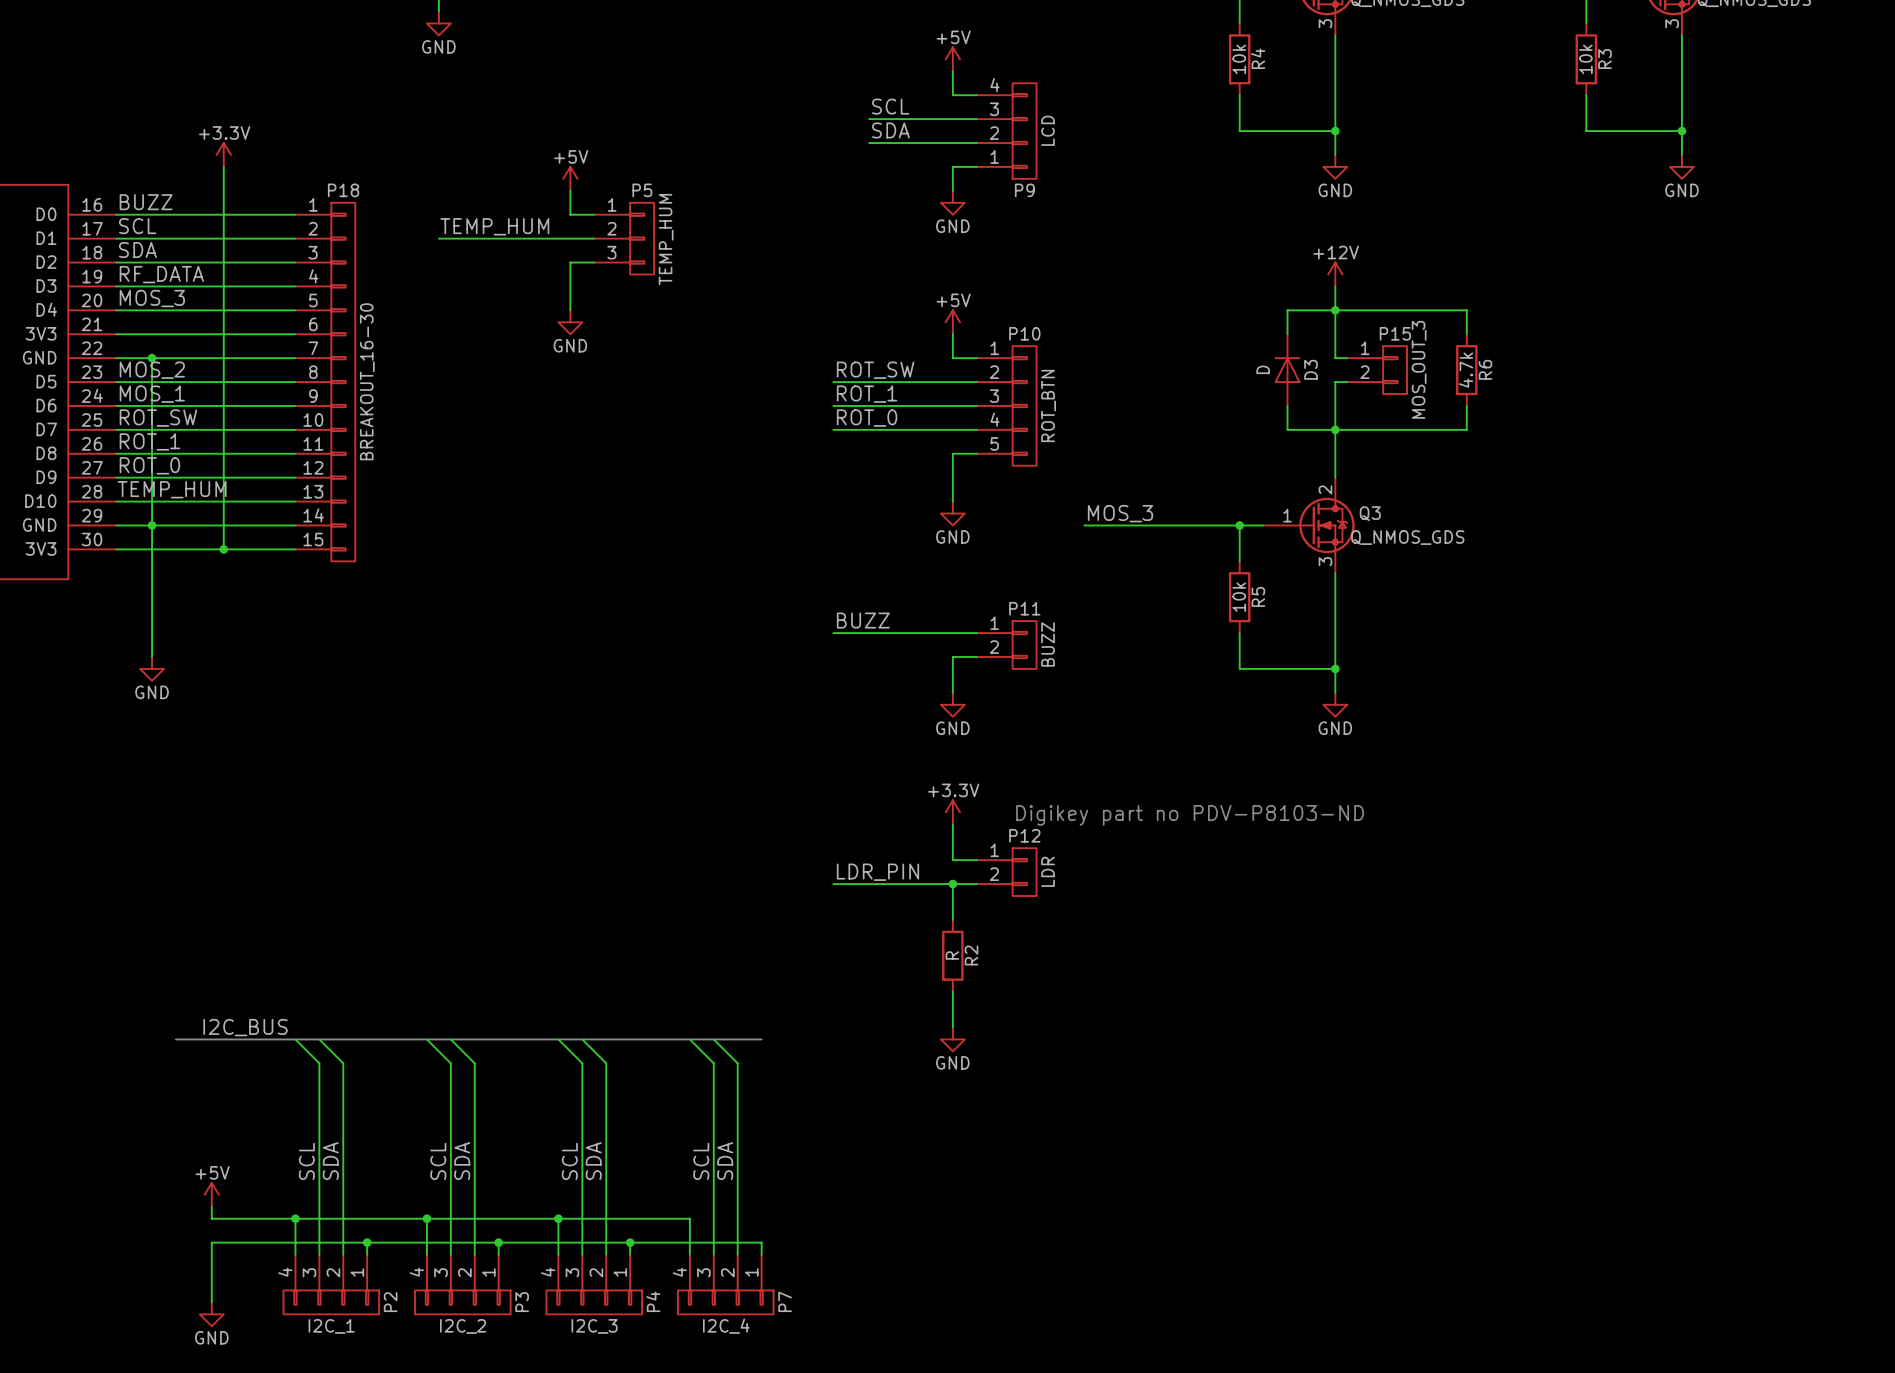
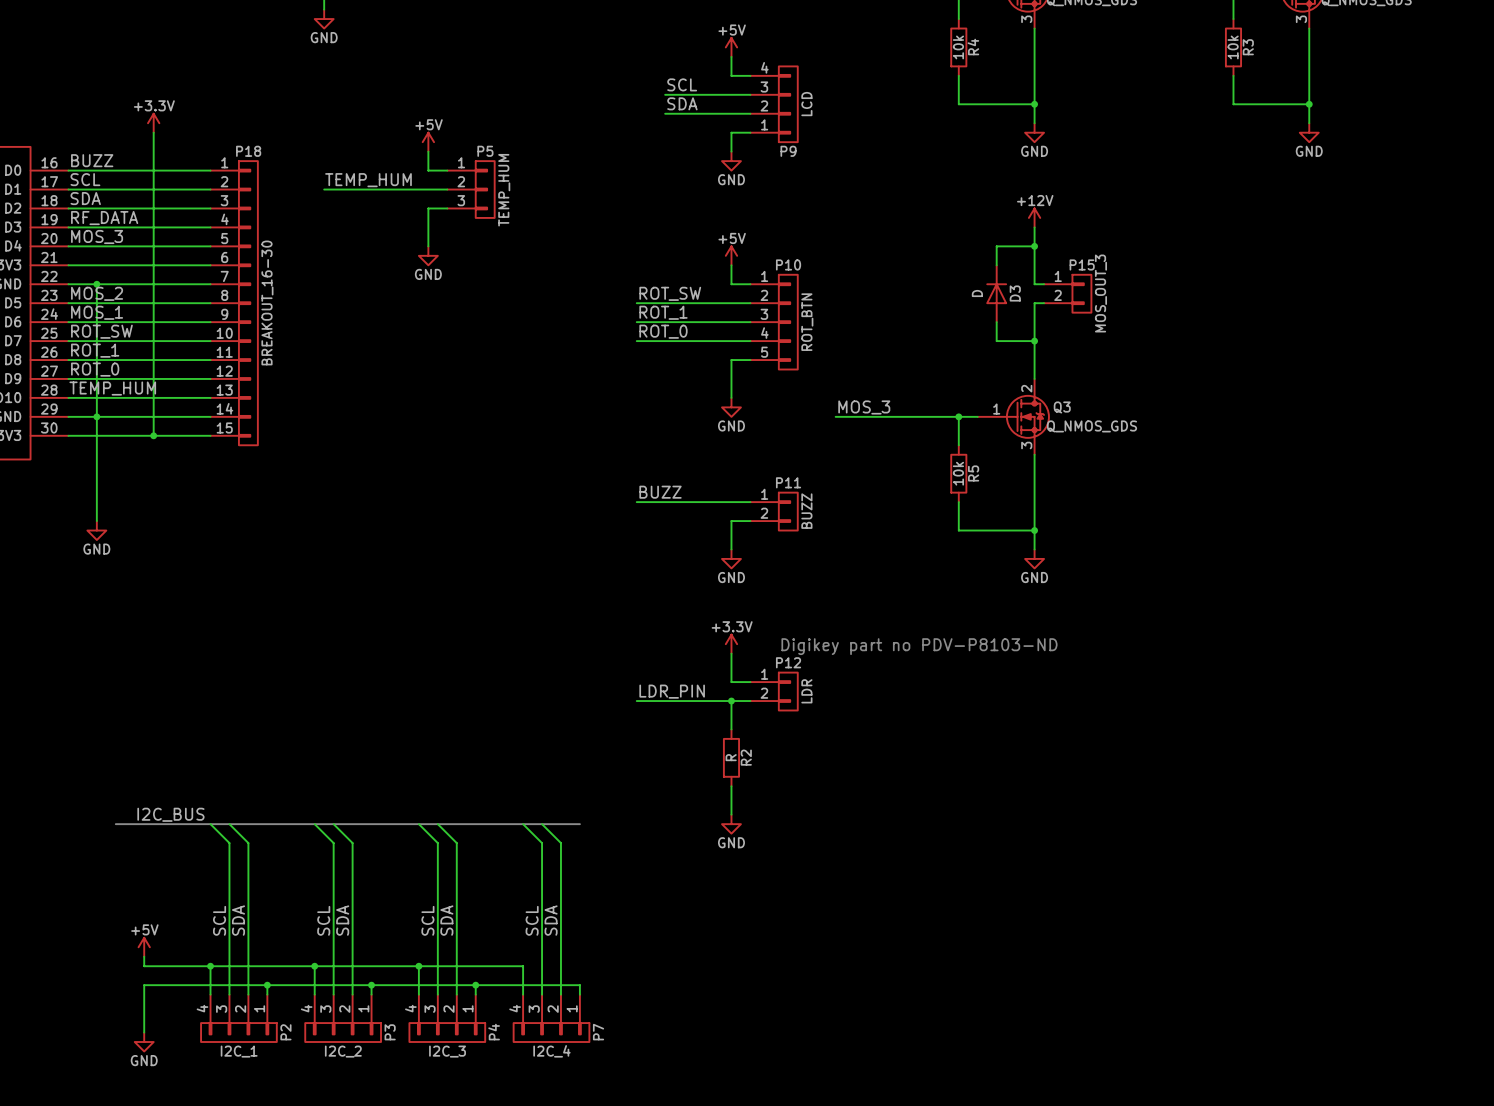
wire: (1335, 310) (1466, 310) (1466, 334) -> none
R6: 4.7k (1466, 370) -> none
wire: (1466, 405) (1466, 429) (1335, 429) -> none

